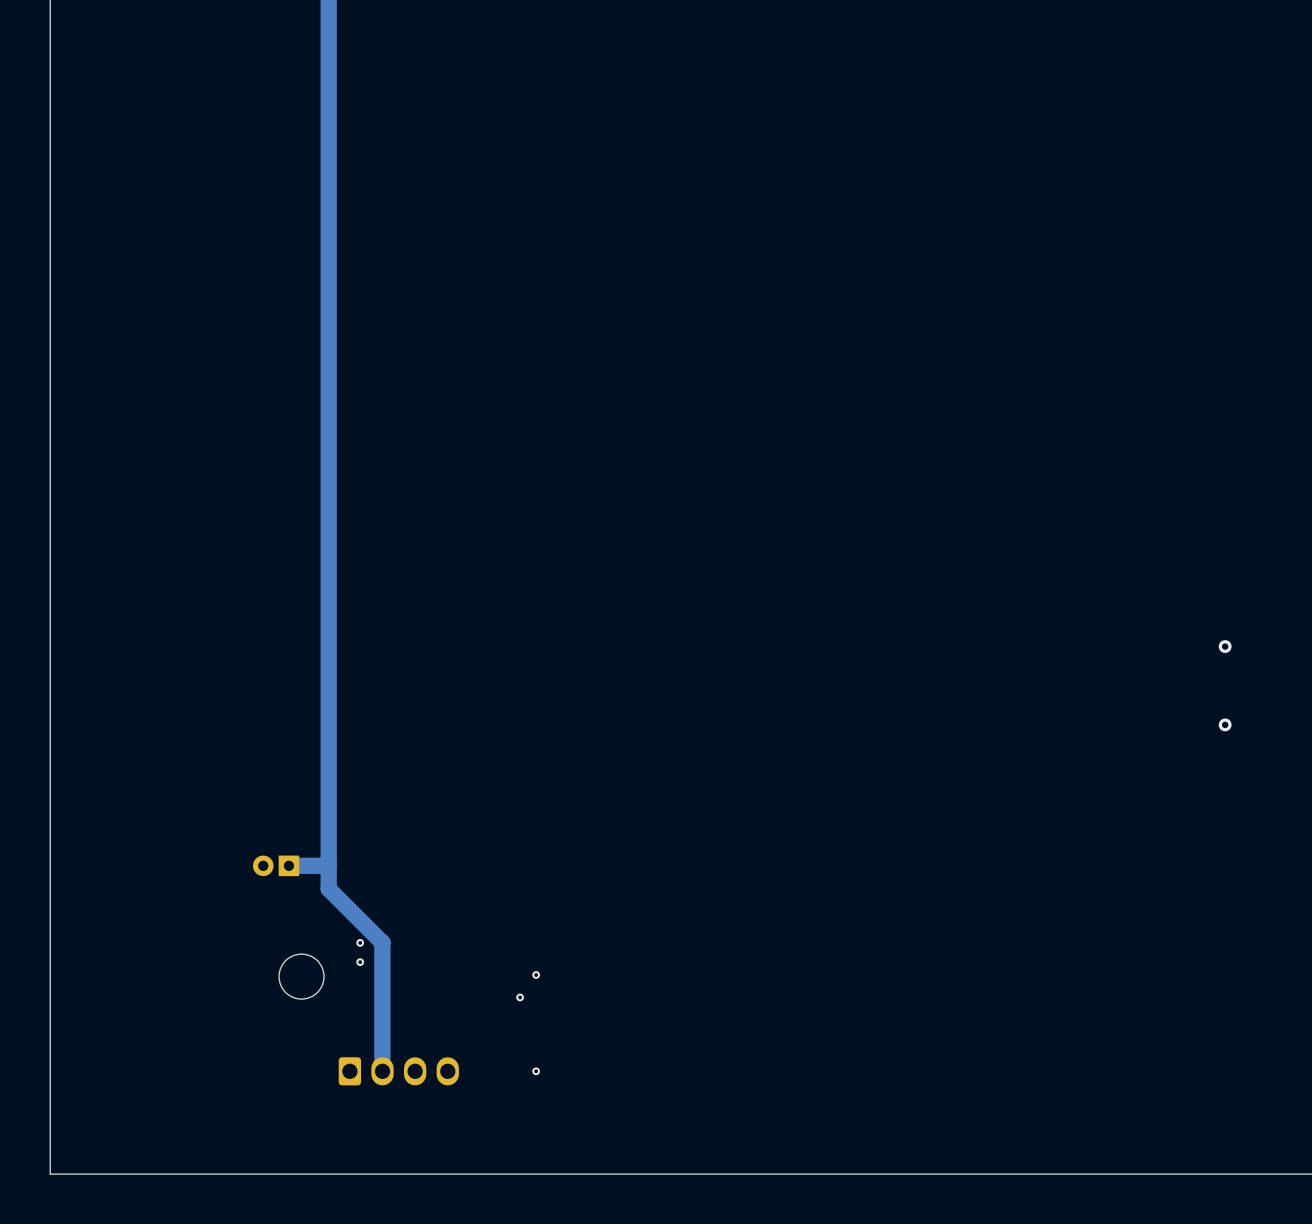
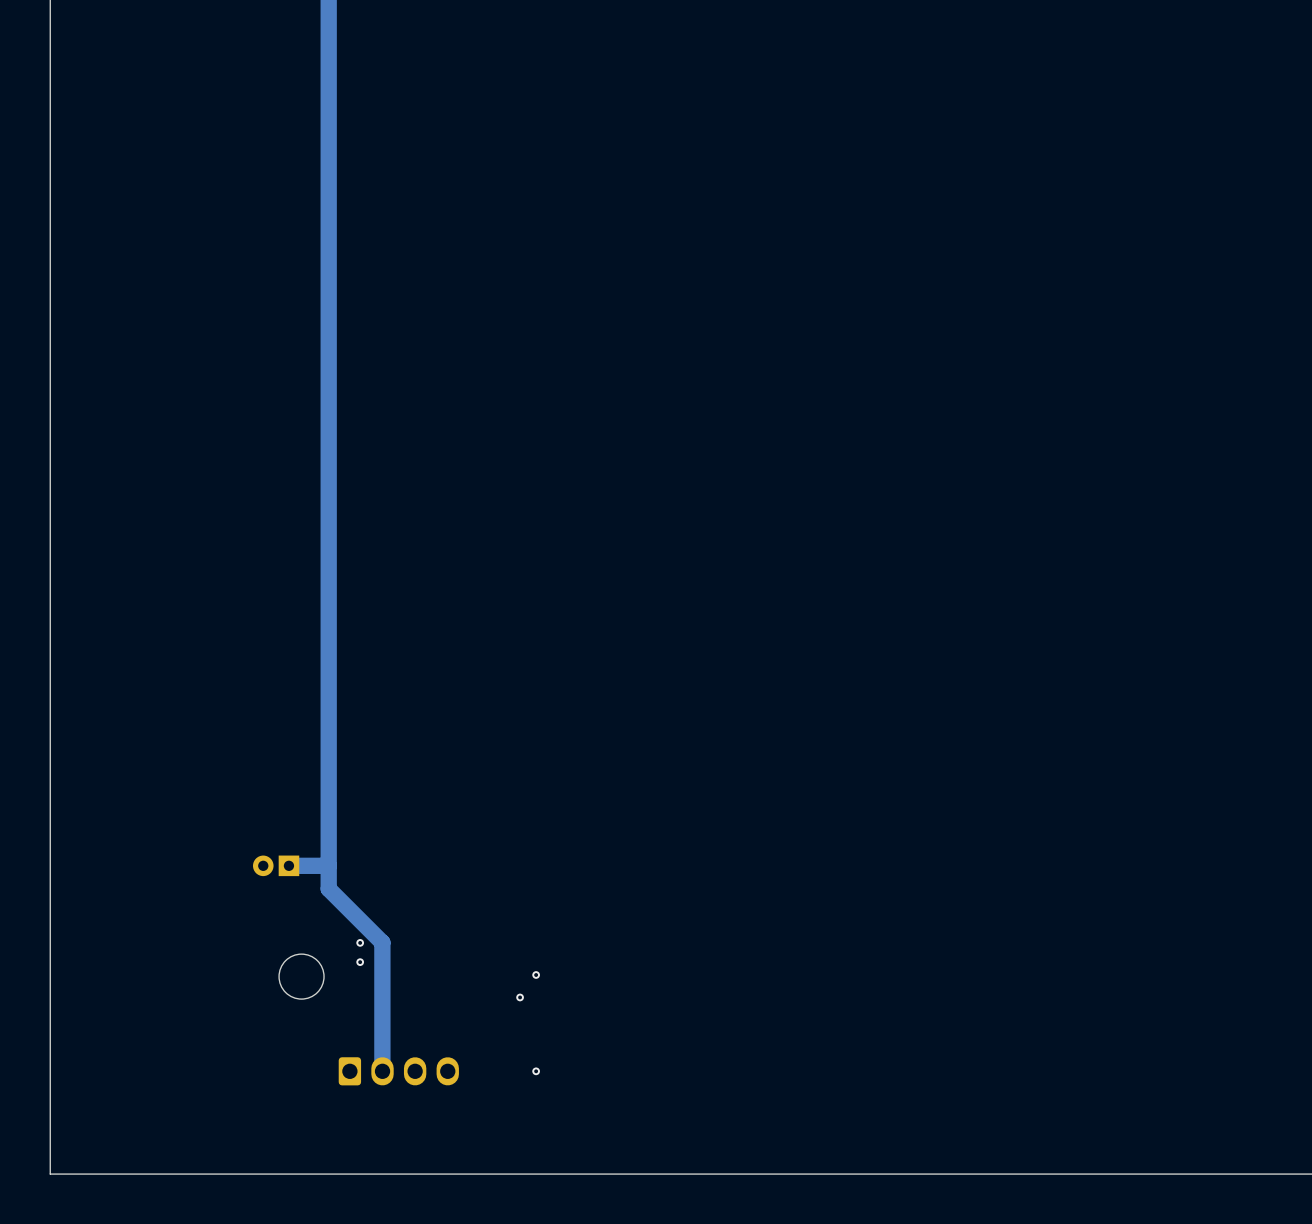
via: (1225, 646) -> none
via: (1225, 724) -> none

